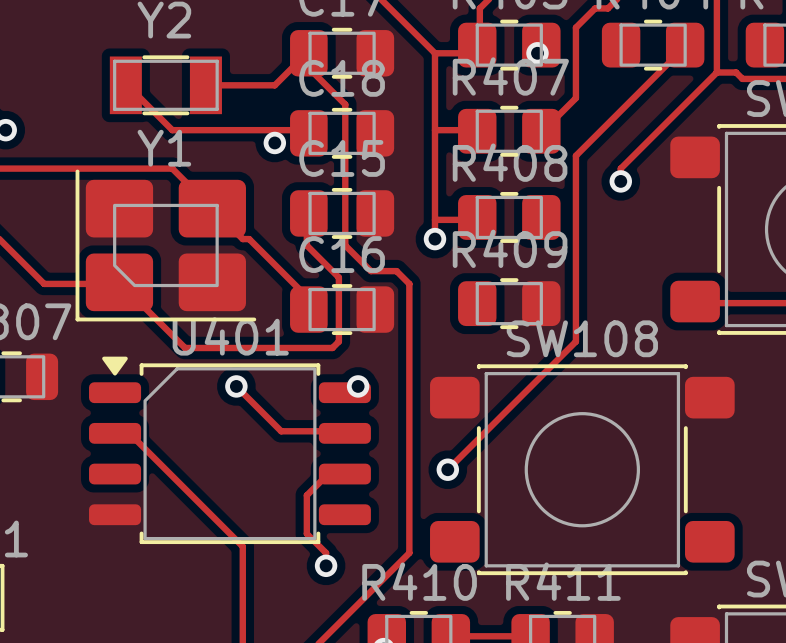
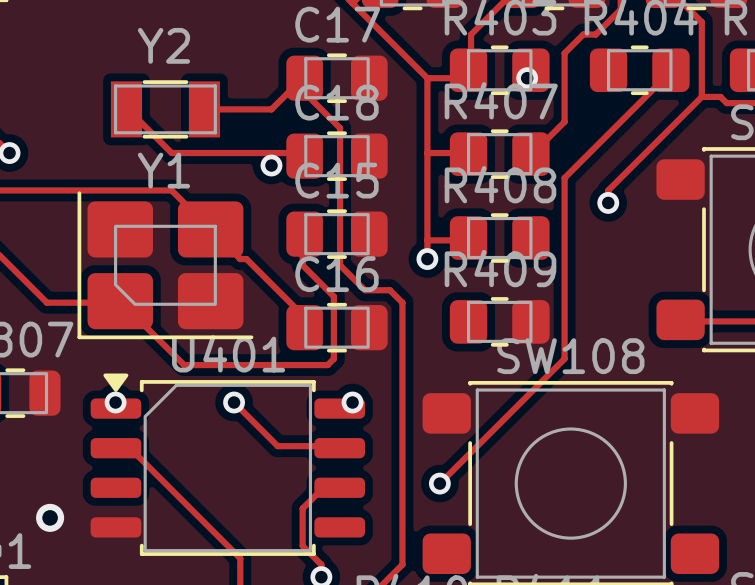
via: none -> (115, 402)
via: none -> (50, 517)

